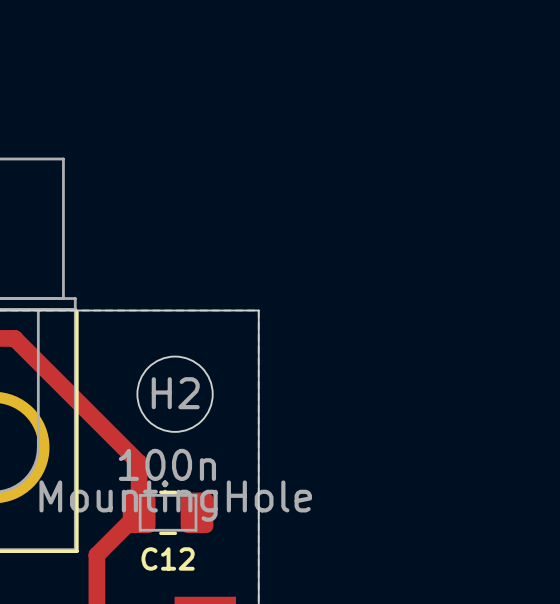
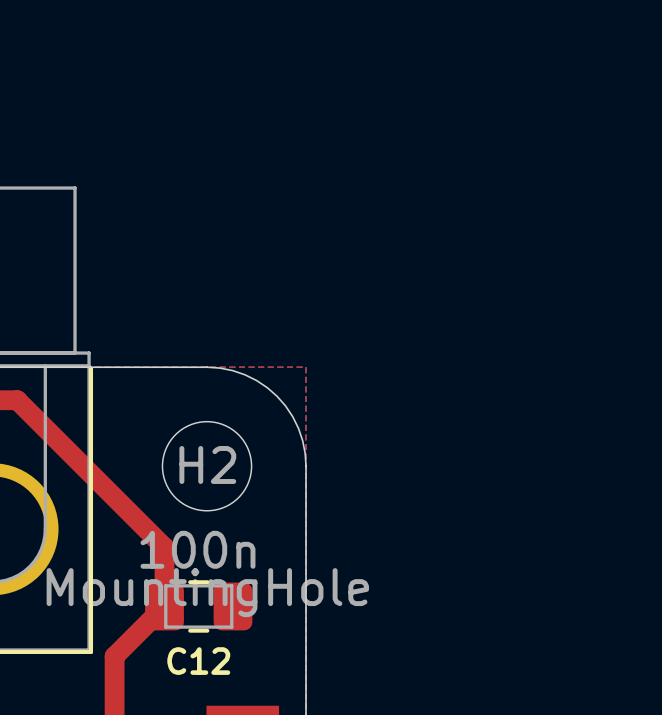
board edge: (175, 310) (258, 310) (258, 394) -> (207, 367) (219, 368) (244, 374) (267, 387) (277, 396) (292, 416) (298, 428) (302, 440) (306, 466)

